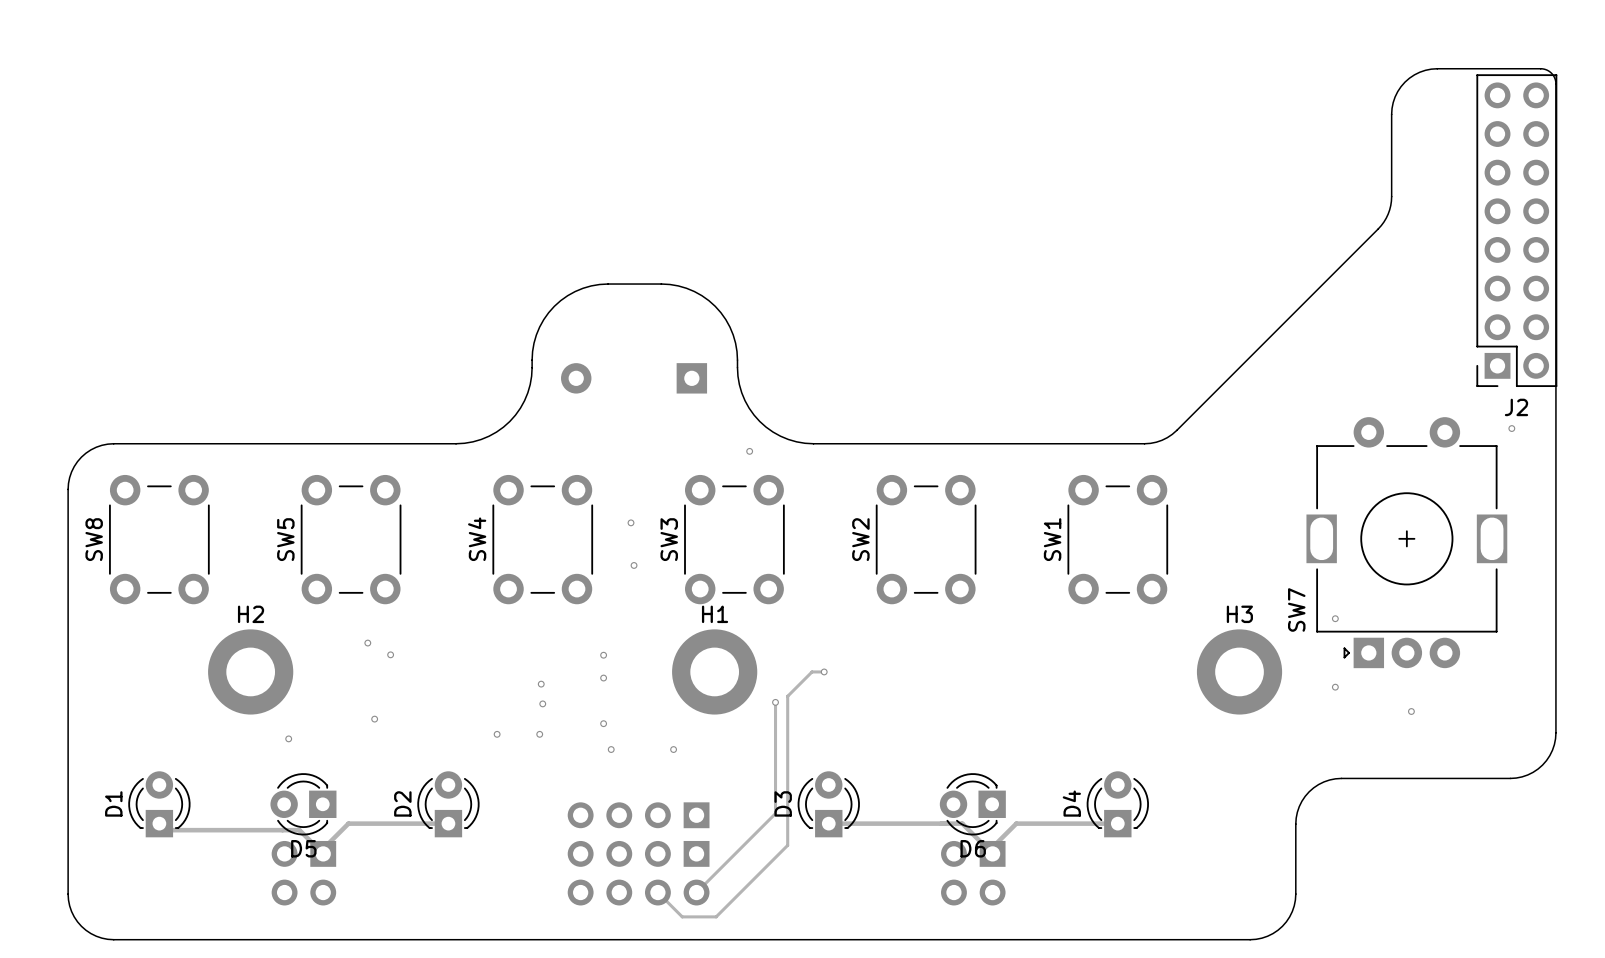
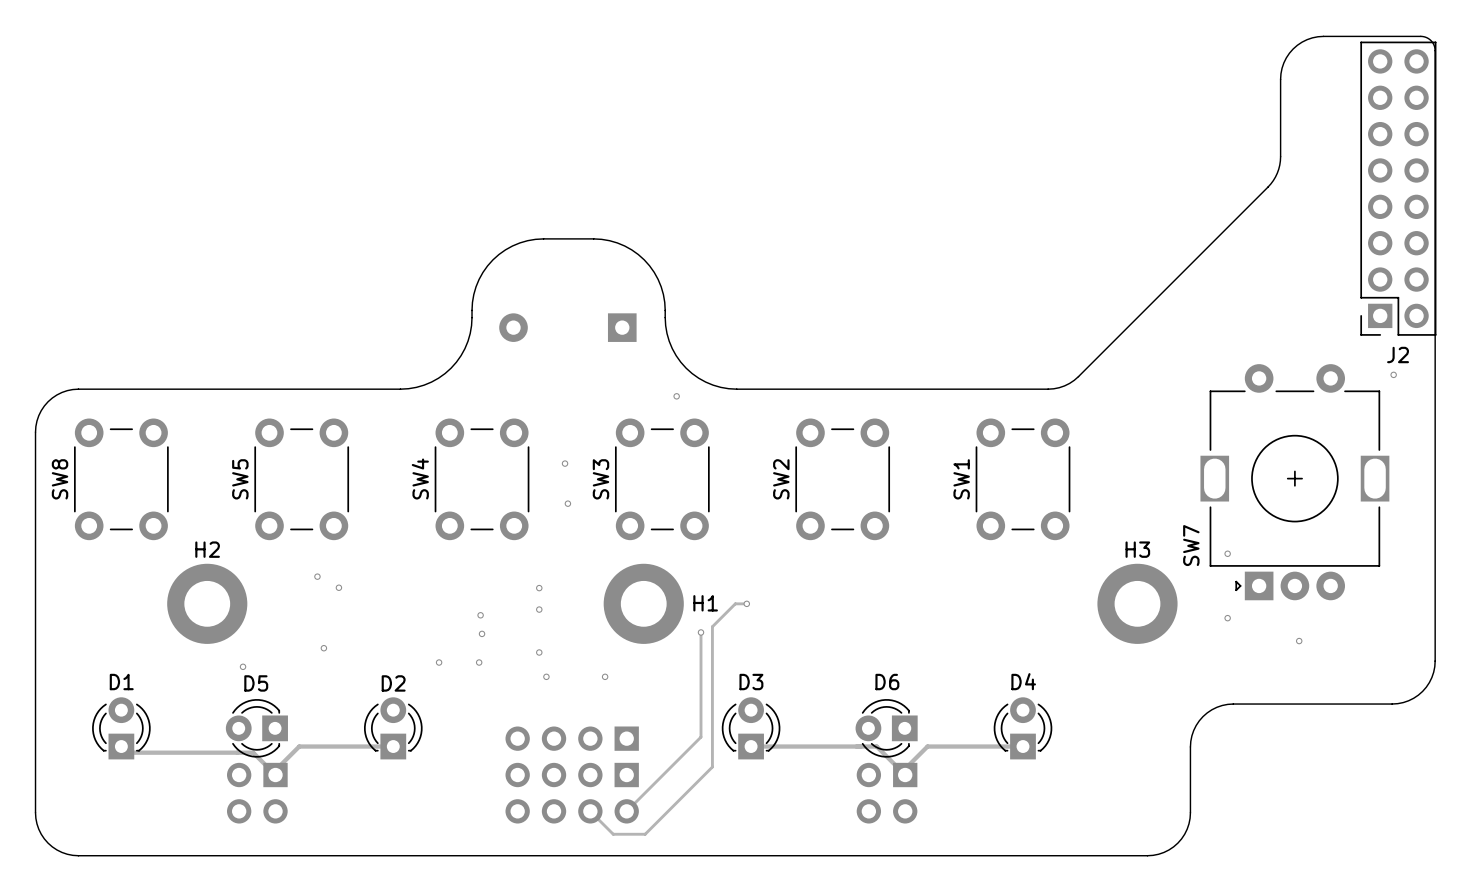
H1 name position: H1 (715, 614) -> H1 (705, 603)
D1 name rotation: 0° (113, 803) -> 90° clockwise (121, 682)
D1 name position: D1 (113, 803) -> D1 (121, 682)
D2 name rotation: 0° (402, 803) -> 90° clockwise (393, 683)
D2 name position: D2 (402, 803) -> D2 (393, 683)
D3 name rotation: 0° (783, 803) -> 90° clockwise (751, 682)
D3 name position: D3 (783, 803) -> D3 (751, 682)
D4 name rotation: 0° (1071, 803) -> 90° clockwise (1023, 681)
D4 name position: D4 (1071, 803) -> D4 (1023, 681)
D5 name position: D5 (303, 848) -> D5 (256, 683)
D6 name position: D6 (973, 848) -> D6 (887, 682)

